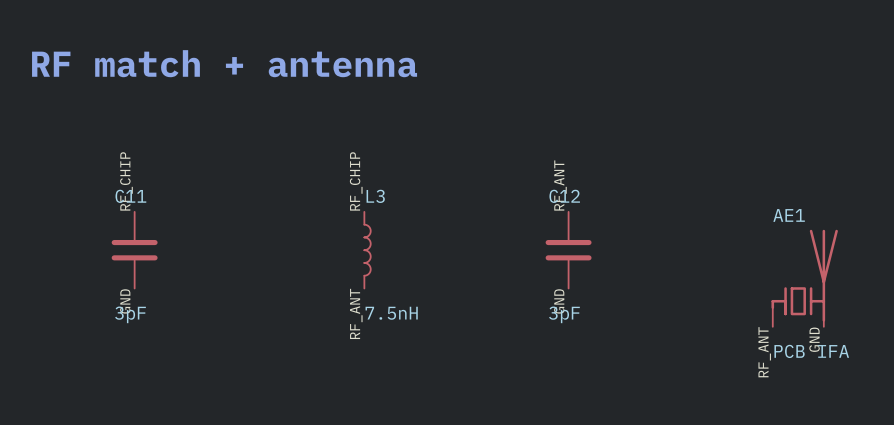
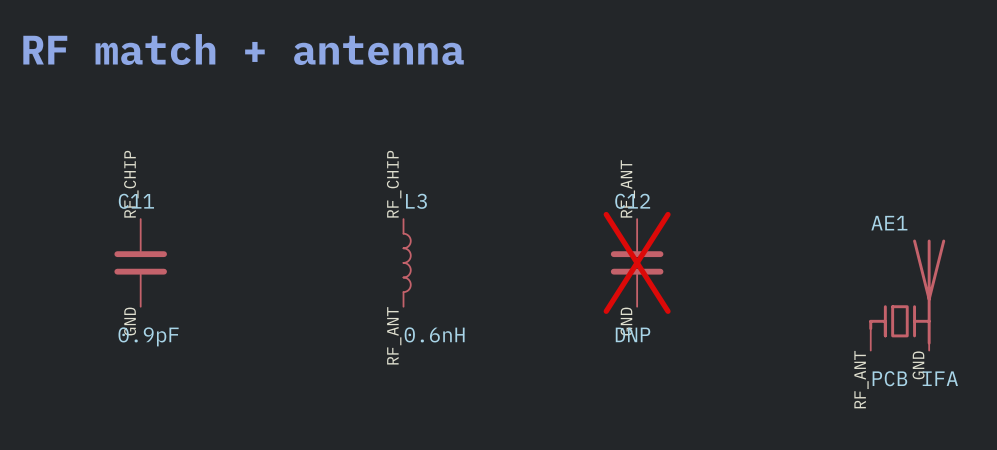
C12 do-not-place cross: none -> (637, 262)
L3 value: 7.5nH (391, 313) -> 0.6nH (434, 334)
C11 value: 3pF (130, 314) -> 0.9pF (148, 336)
C12 value: 3pF (564, 314) -> DNP (633, 334)

